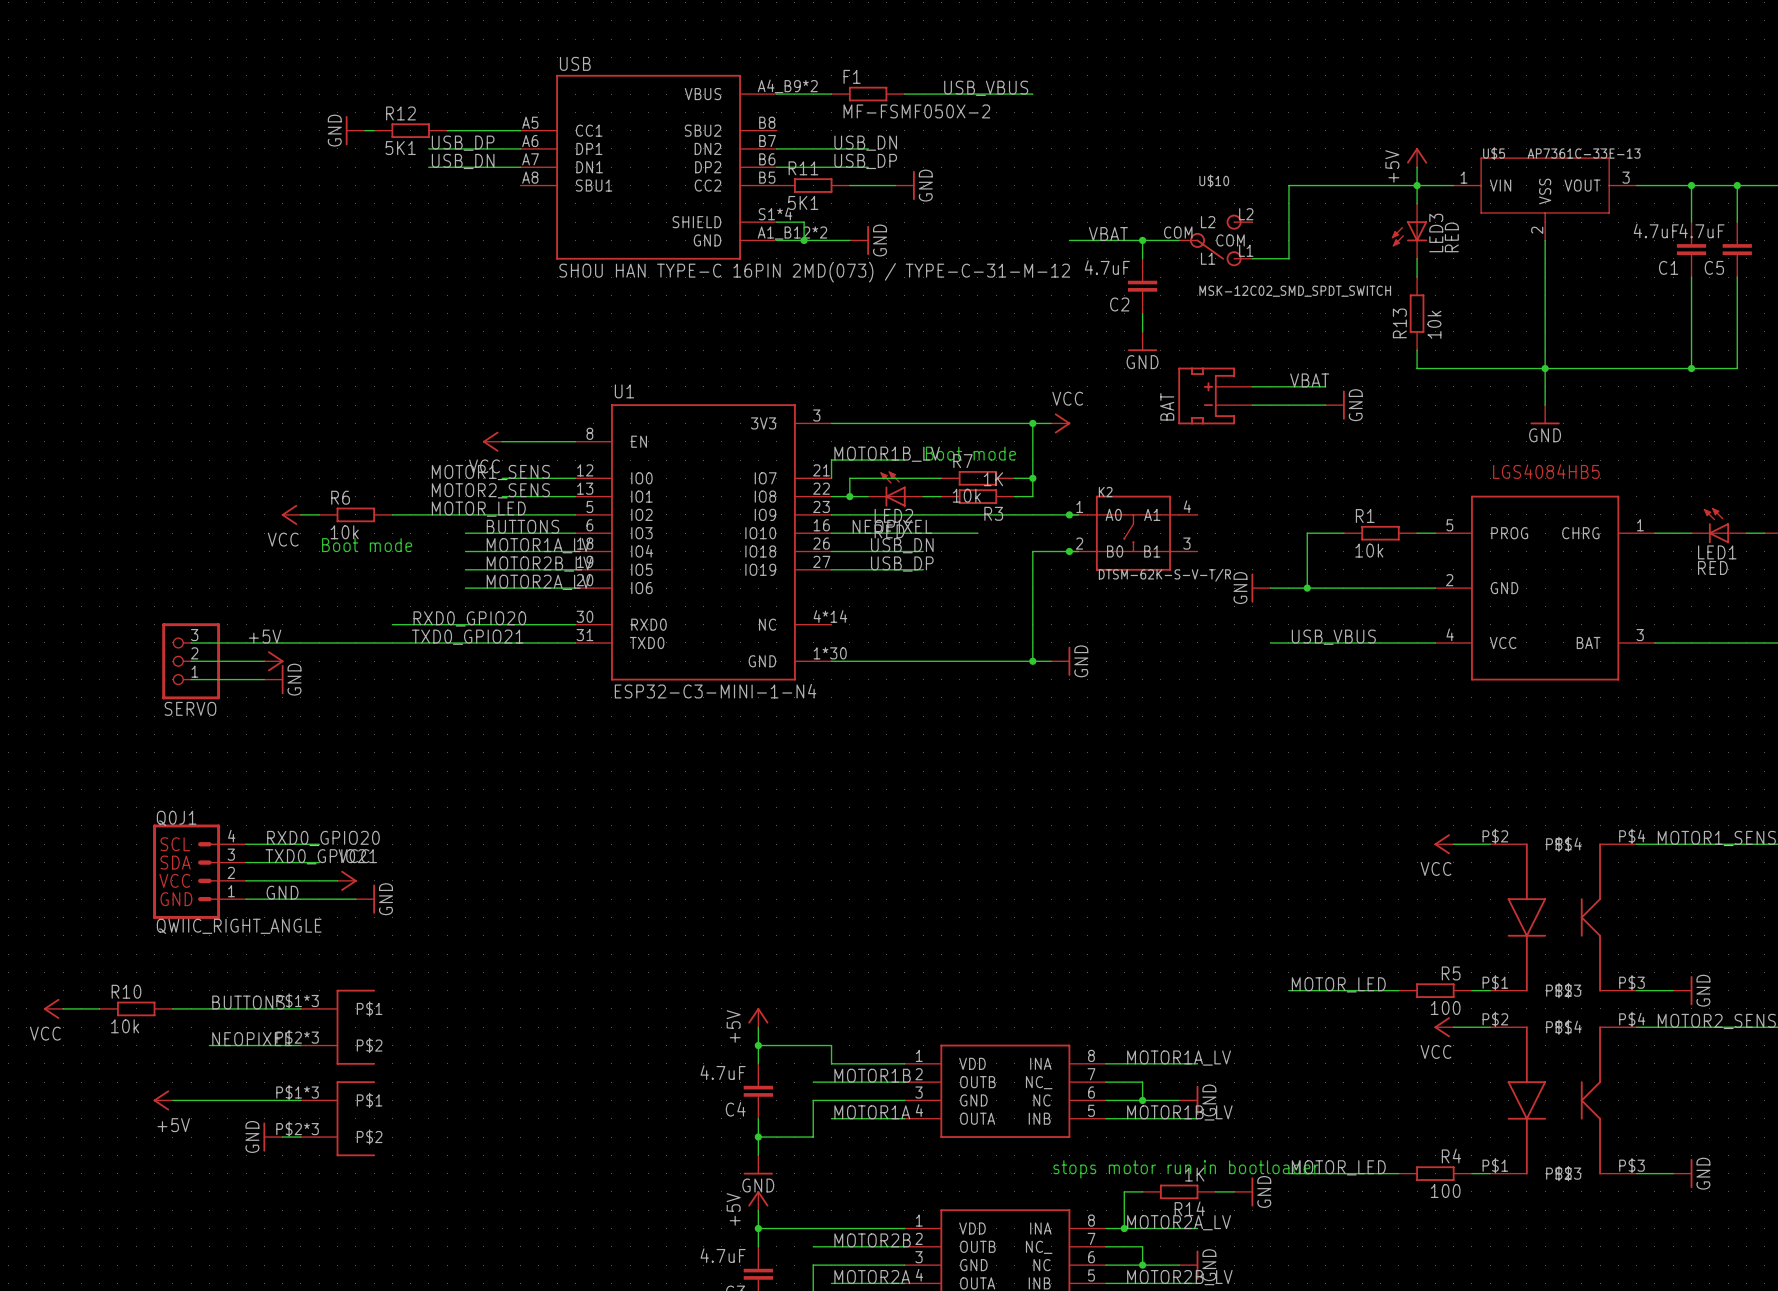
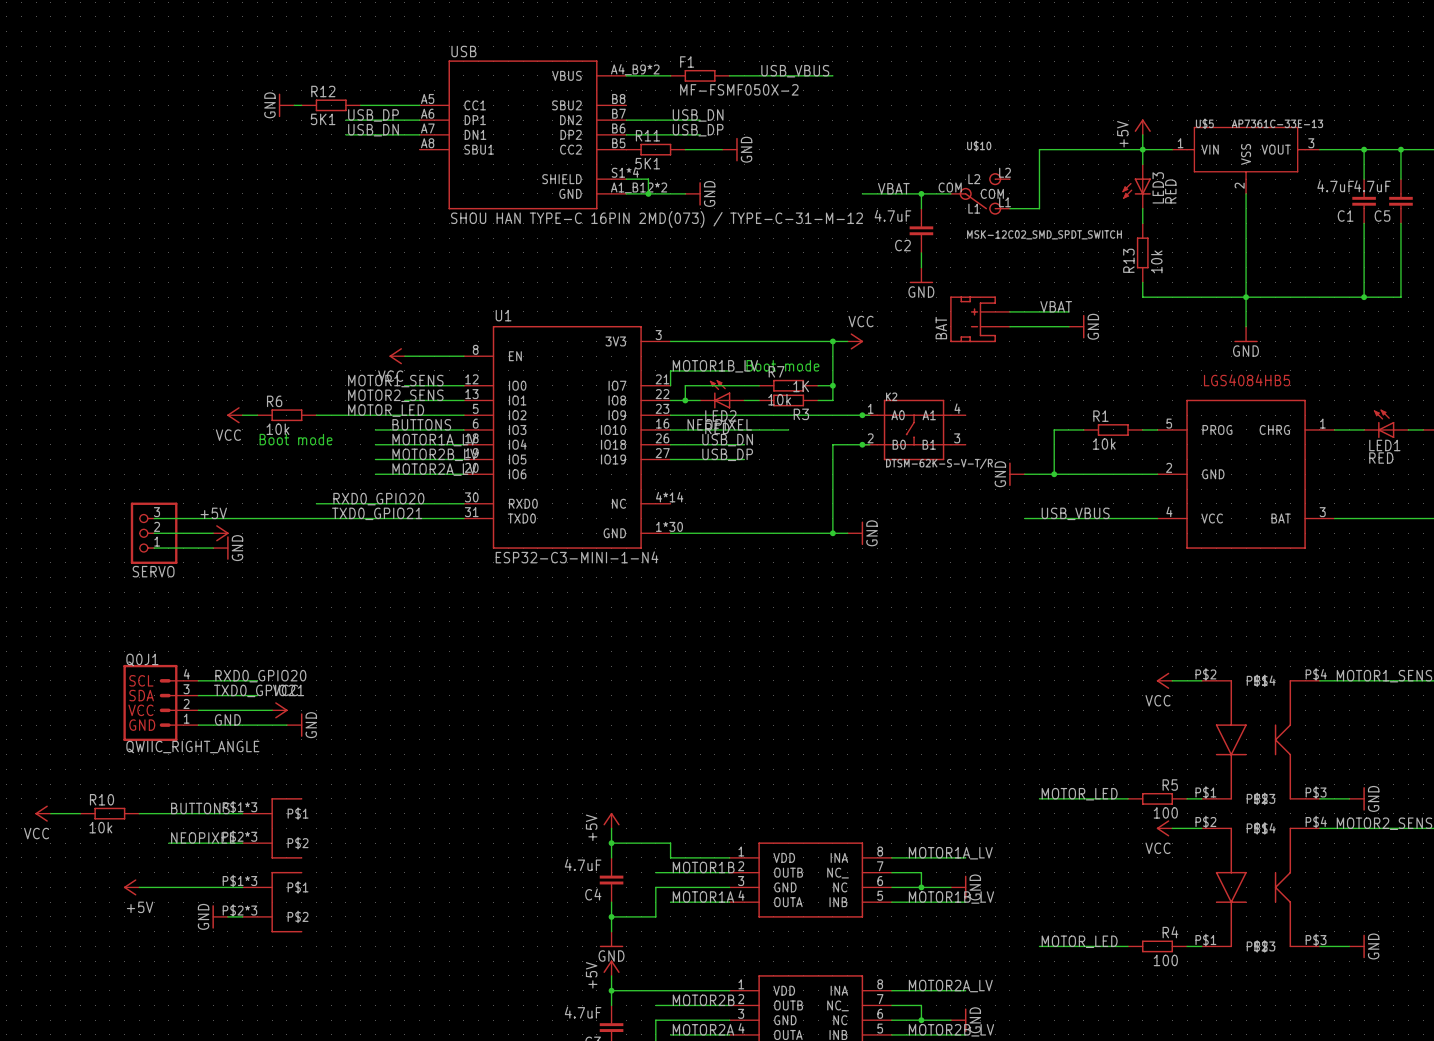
text: stops motor run in bootloader (1186, 1169) -> none
wire: (1142, 1191) (1124, 1191) (1124, 1228) -> none
R14: 1K (1179, 1191) -> none
wire: (1215, 1191) (1234, 1191) -> none
power symbol: GND (1243, 1191) -> none
junction: (1124, 1228) -> none

